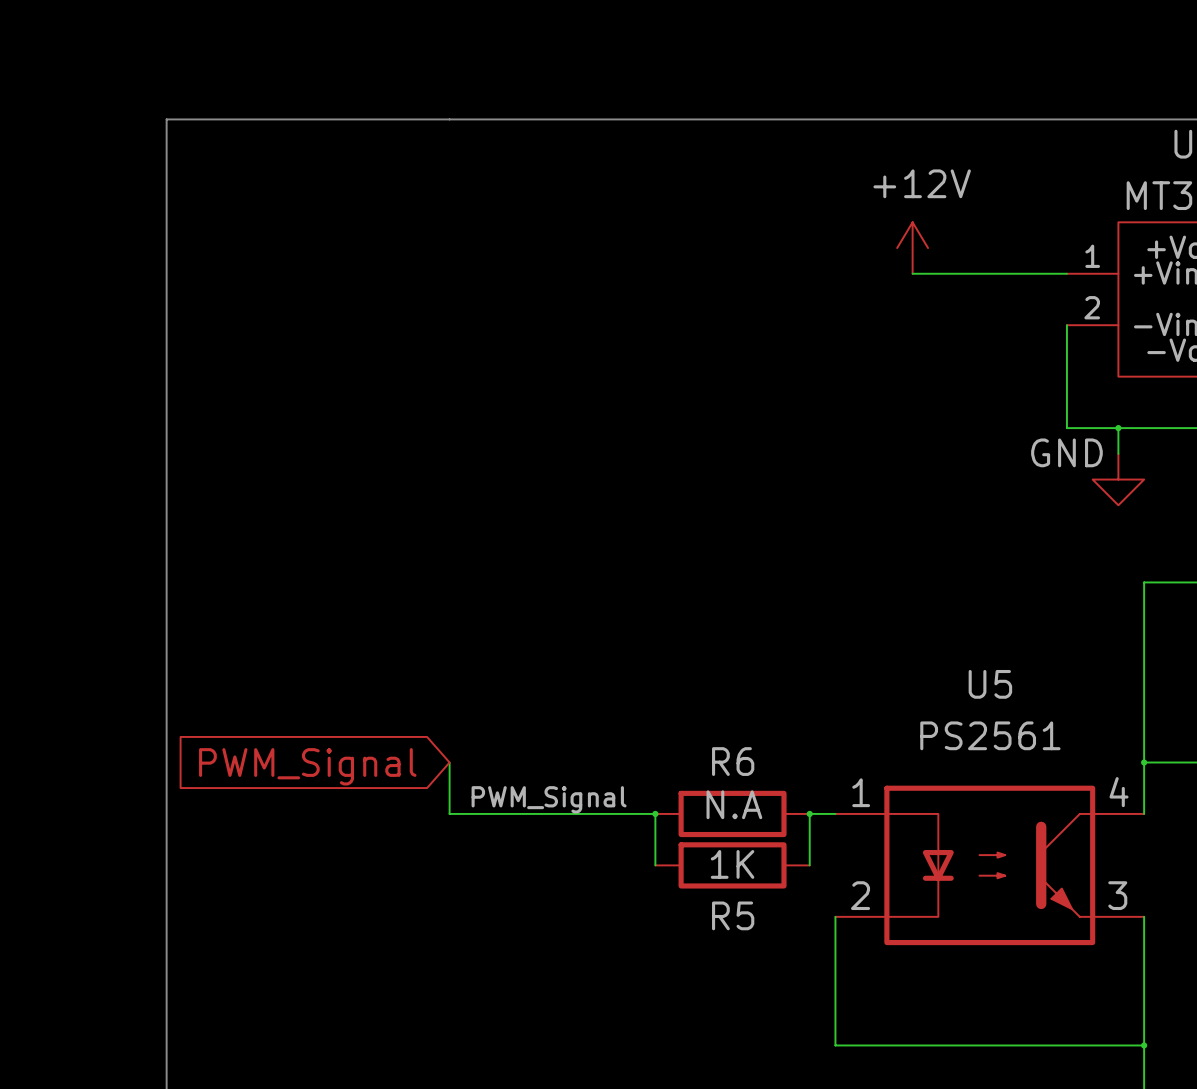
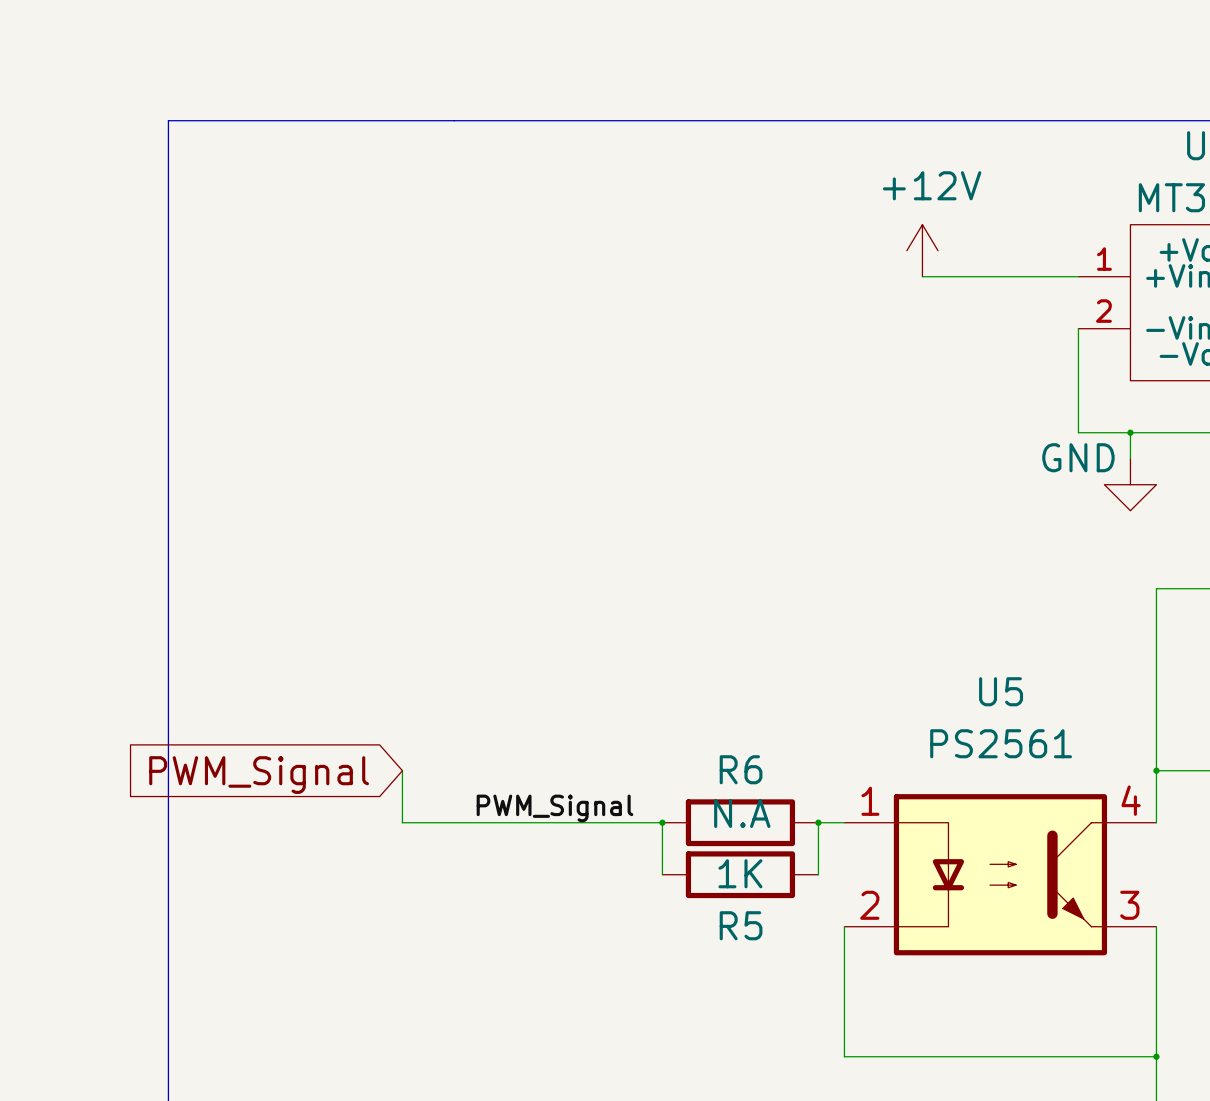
wire: (449, 762) (449, 813) -> (402, 770) (402, 822) (454, 822)
global label position: PWM_Signal (307, 766) -> PWM_Signal (259, 775)

